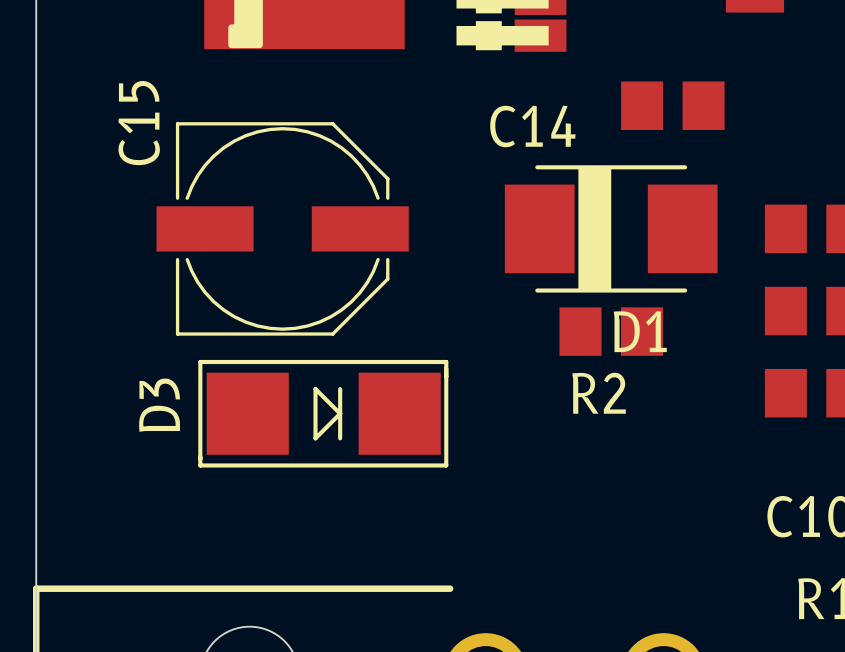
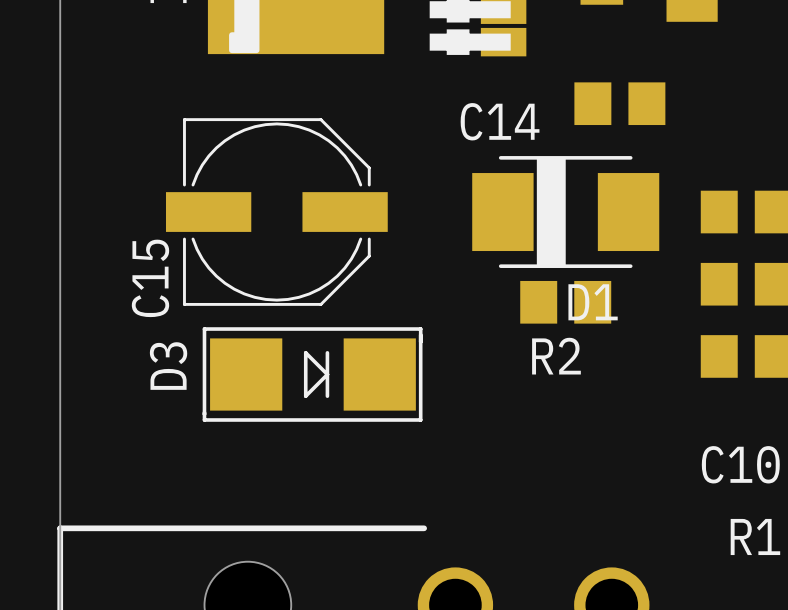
C15 name position: C15 (139, 123) -> C15 (150, 278)

